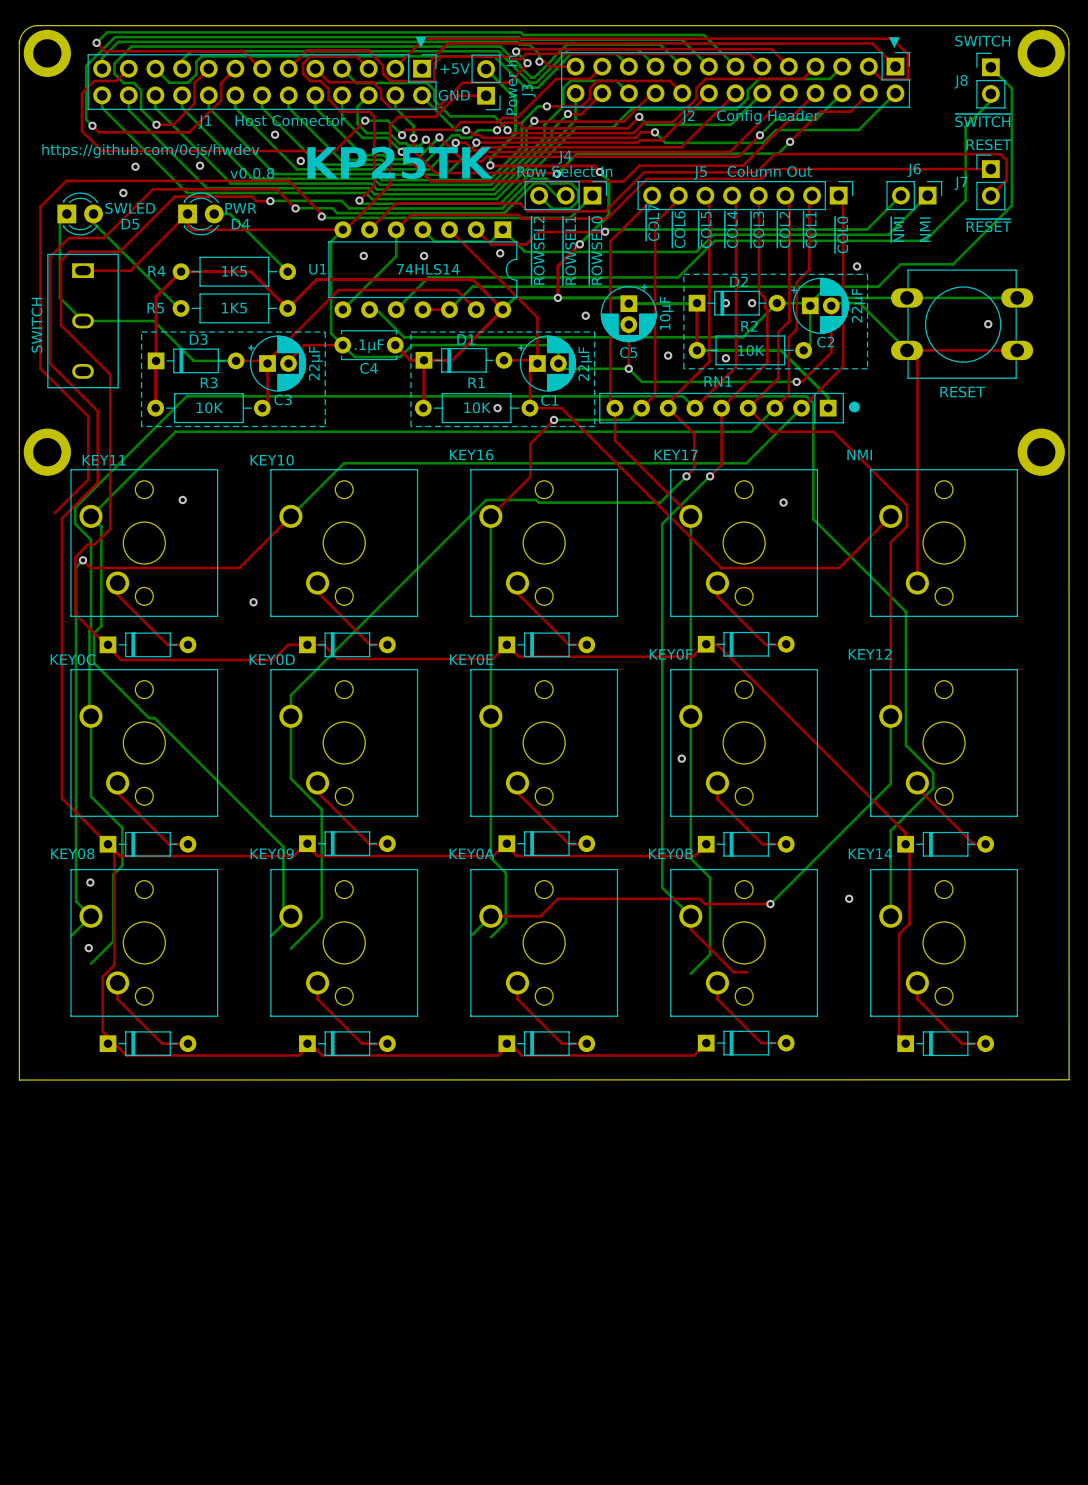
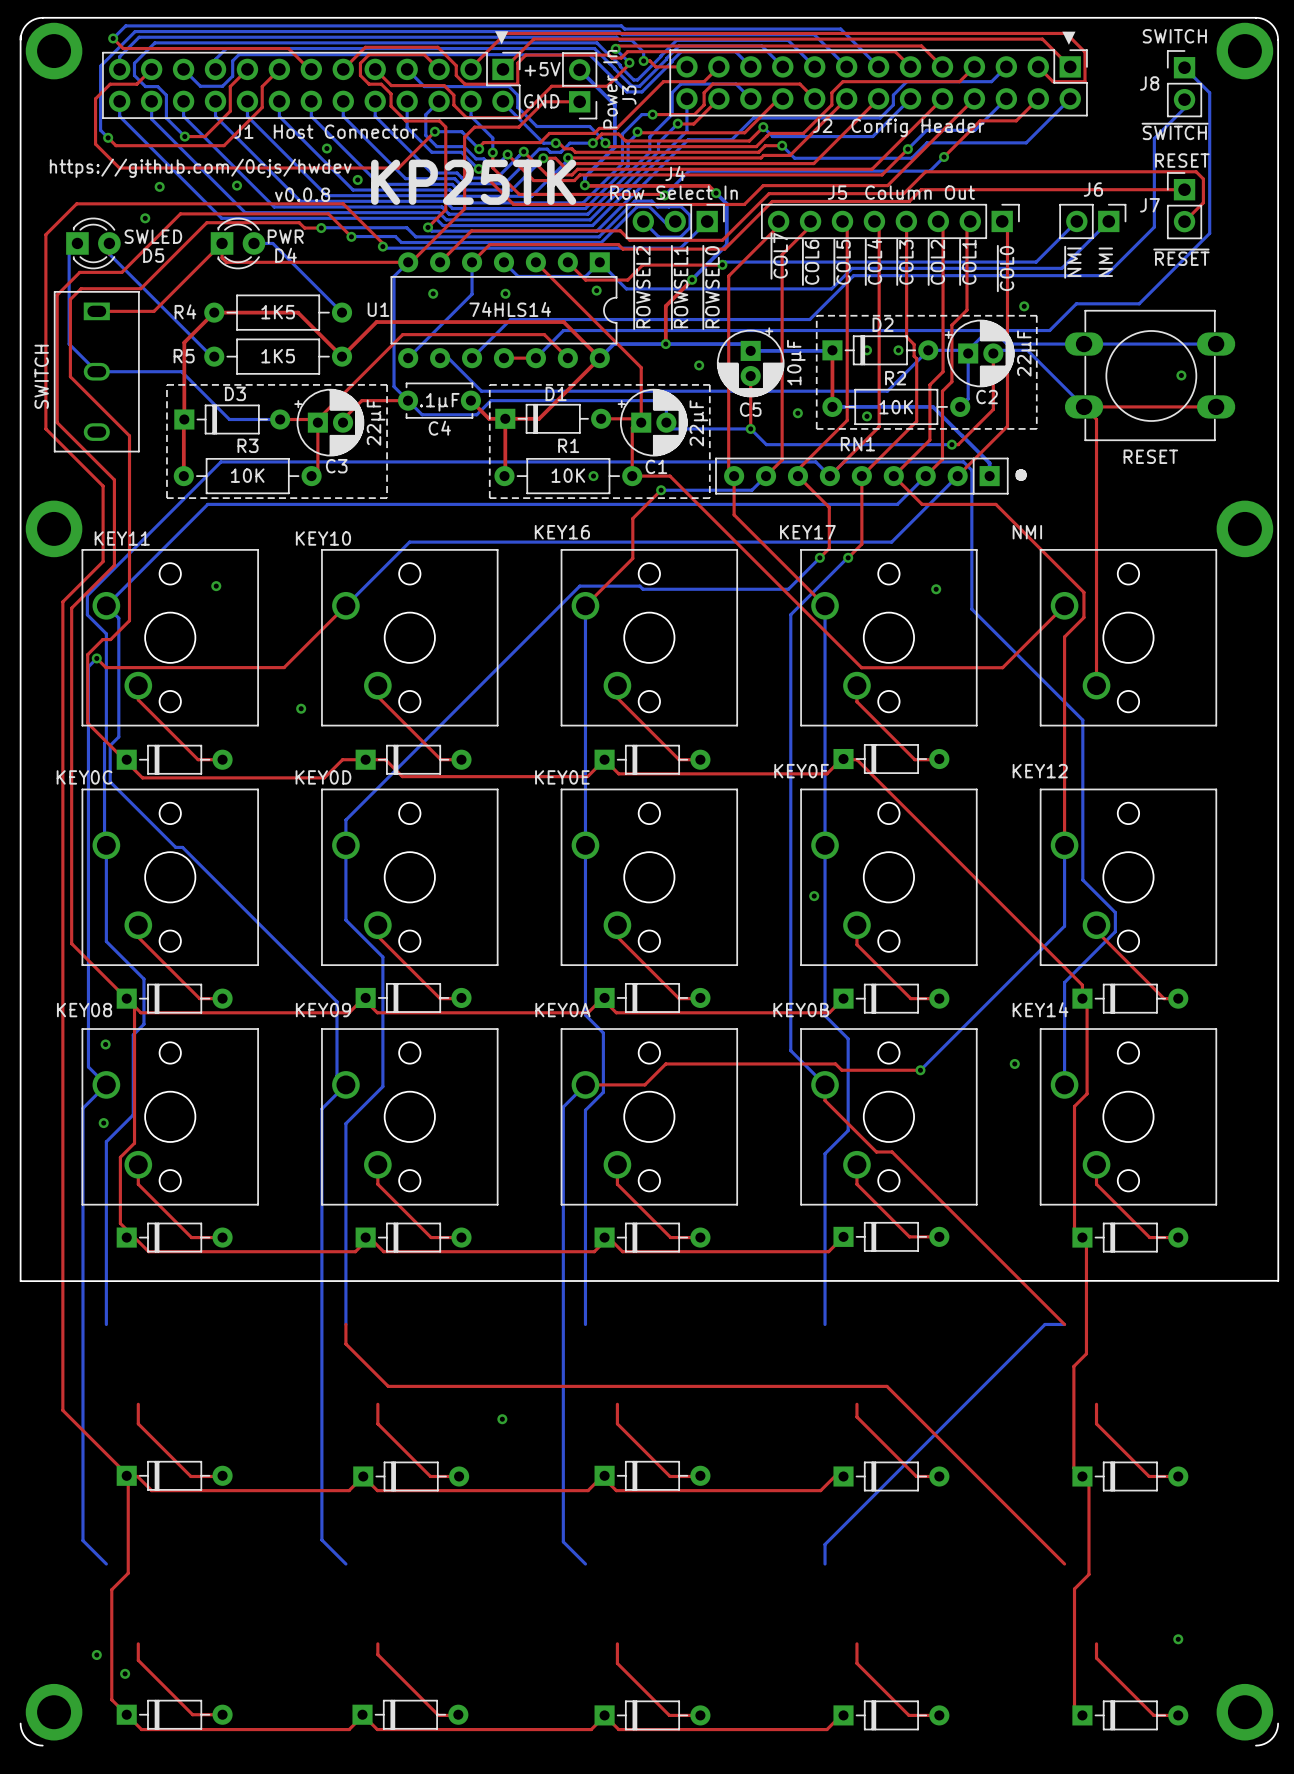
top track: none -> (62, 601) (62, 1410) (124, 1471) (124, 1476) (137, 1476) (151, 1490) (349, 1490) (363, 1476) (377, 1490) (588, 1490) (602, 1476) (616, 1490) (820, 1490) (834, 1476)
bottom track: none -> (563, 1107) (563, 1541) (585, 1564)
bottom track: none -> (82, 1108) (82, 1540) (106, 1564)
bottom track: none -> (321, 1108) (321, 1539) (345, 1564)
bottom track: none -> (585, 1110) (585, 1324)
bottom track: none -> (345, 1123) (345, 1324)
bottom track: none -> (106, 1141) (106, 1324)
top track: none -> (892, 1151) (1064, 1324)
bottom track: none -> (825, 1153) (825, 1324)
top track: none -> (1086, 1241) (1086, 1353) (1073, 1366) (1073, 1467) (1088, 1483) (1088, 1574) (1074, 1588) (1074, 1709) (1080, 1715)
top track: none -> (345, 1324) (345, 1344) (388, 1386) (886, 1386) (1064, 1564)
bottom track: none -> (1064, 1324) (1045, 1324) (825, 1544) (825, 1564)
top track: none -> (138, 1404) (138, 1423) (190, 1476) (220, 1476)
top track: none -> (377, 1404) (377, 1423) (430, 1476) (459, 1476)
top track: none -> (617, 1404) (617, 1423) (670, 1476) (698, 1476)
top track: none -> (856, 1404) (856, 1417) (916, 1476) (930, 1476)
top track: none -> (1096, 1404) (1096, 1423) (1149, 1476) (1182, 1476)
via: none -> (502, 1419)
part: none -> (174, 1475)
part: none -> (652, 1475)
top track: none -> (127, 1476) (128, 1573) (111, 1589) (111, 1699) (141, 1729) (349, 1729) (363, 1715) (377, 1729) (591, 1729) (604, 1715) (618, 1729) (826, 1729) (841, 1715)
part: none -> (411, 1476)
part: none -> (891, 1476)
part: none -> (1130, 1476)
via: none -> (1178, 1639)
top track: none -> (138, 1643) (138, 1660) (192, 1714) (222, 1714)
top track: none -> (377, 1643) (377, 1654) (438, 1715) (452, 1715)
top track: none -> (617, 1643) (617, 1663) (669, 1715) (698, 1715)
top track: none -> (856, 1643) (856, 1663) (908, 1715) (936, 1715)
top track: none -> (1096, 1643) (1096, 1658) (1153, 1715) (1175, 1715)
via: none -> (96, 1654)
via: none -> (125, 1673)
part: none -> (54, 1712)
part: none -> (1244, 1712)
part: none -> (174, 1714)
part: none -> (410, 1714)
part: none -> (652, 1715)
part: none -> (891, 1715)
part: none -> (1130, 1715)
board edge: none -> (20, 1723) (22, 1731) (27, 1739) (34, 1743) (42, 1745)
board edge: none -> (1278, 1723) (1276, 1731) (1271, 1739) (1264, 1743) (1255, 1745)

